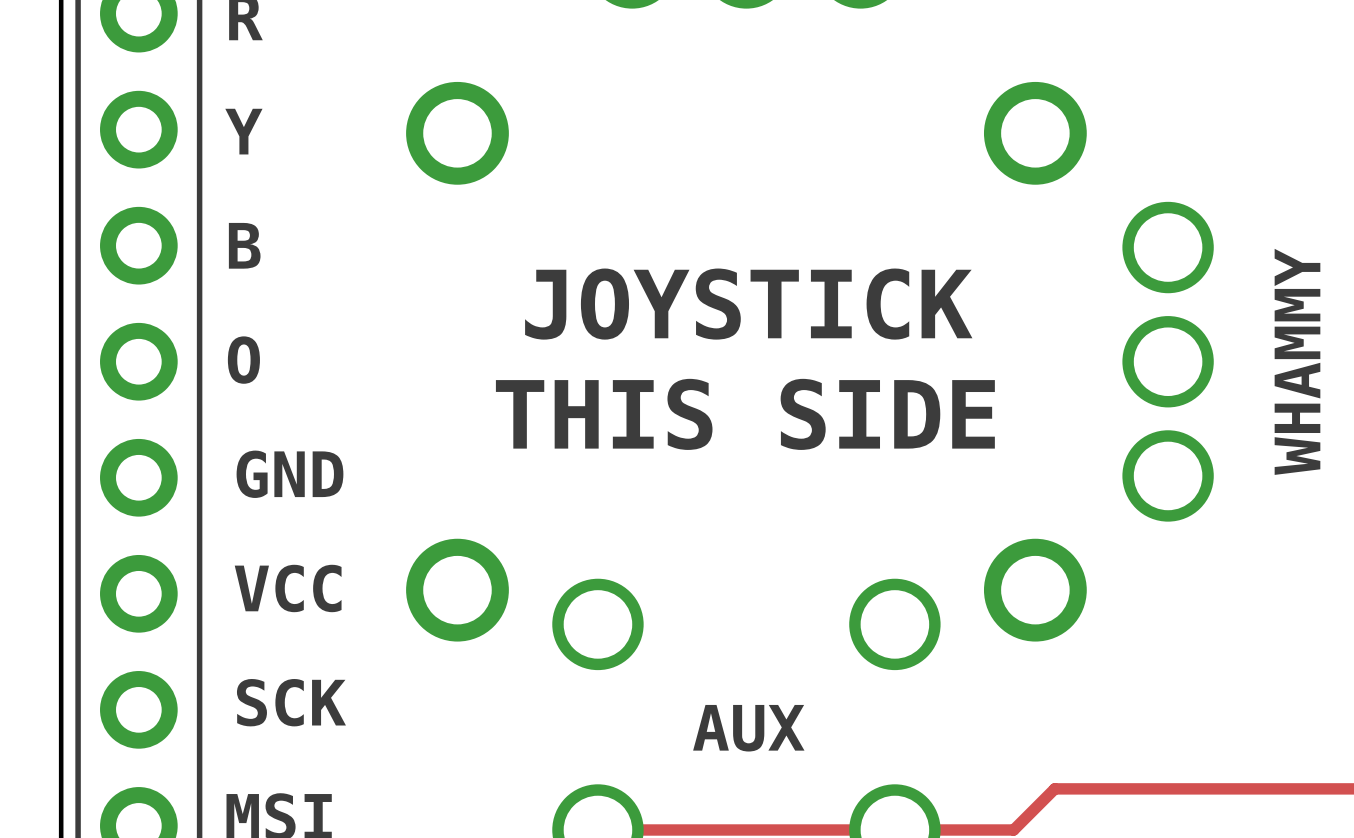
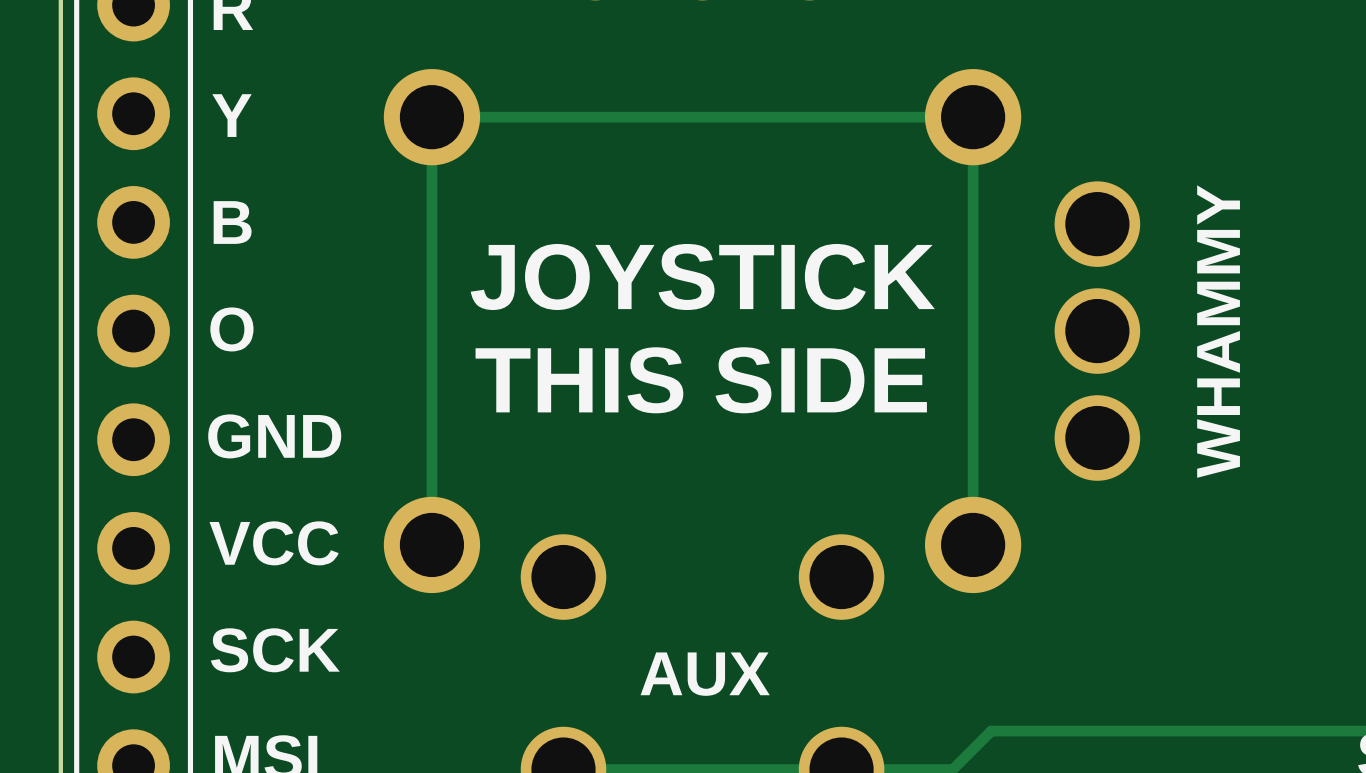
track: none -> (431, 544) (431, 117) (973, 117) (973, 544)

